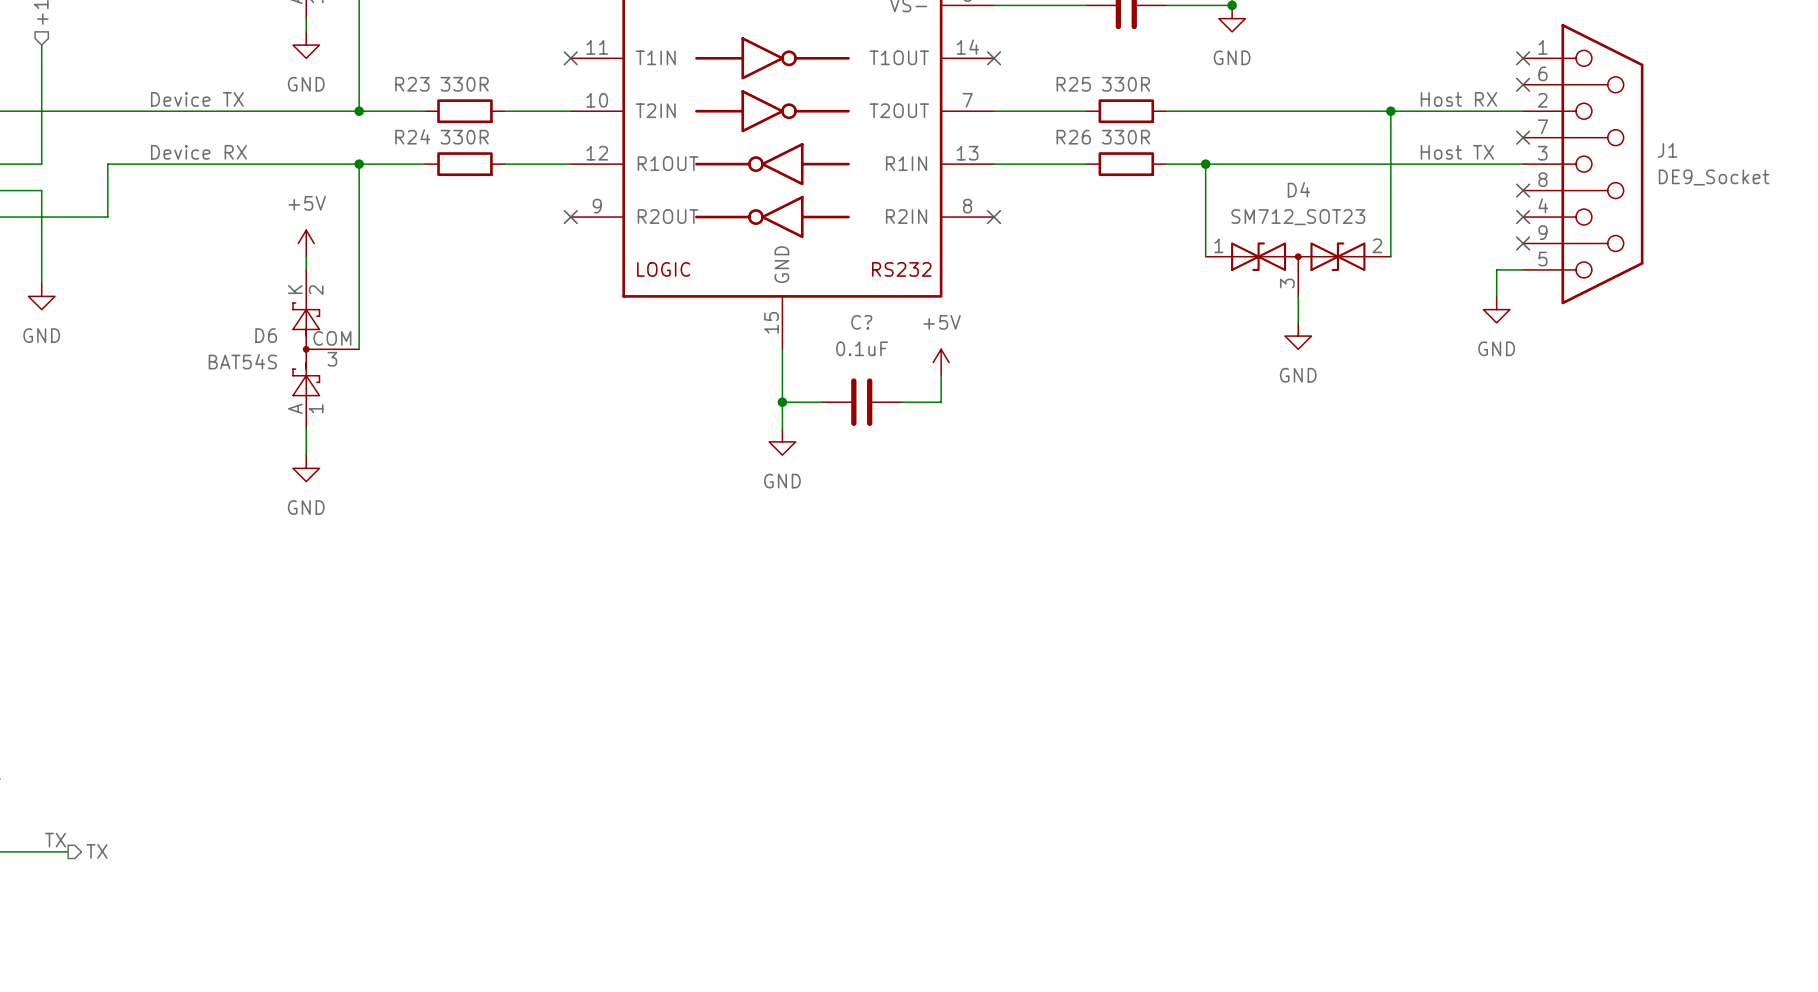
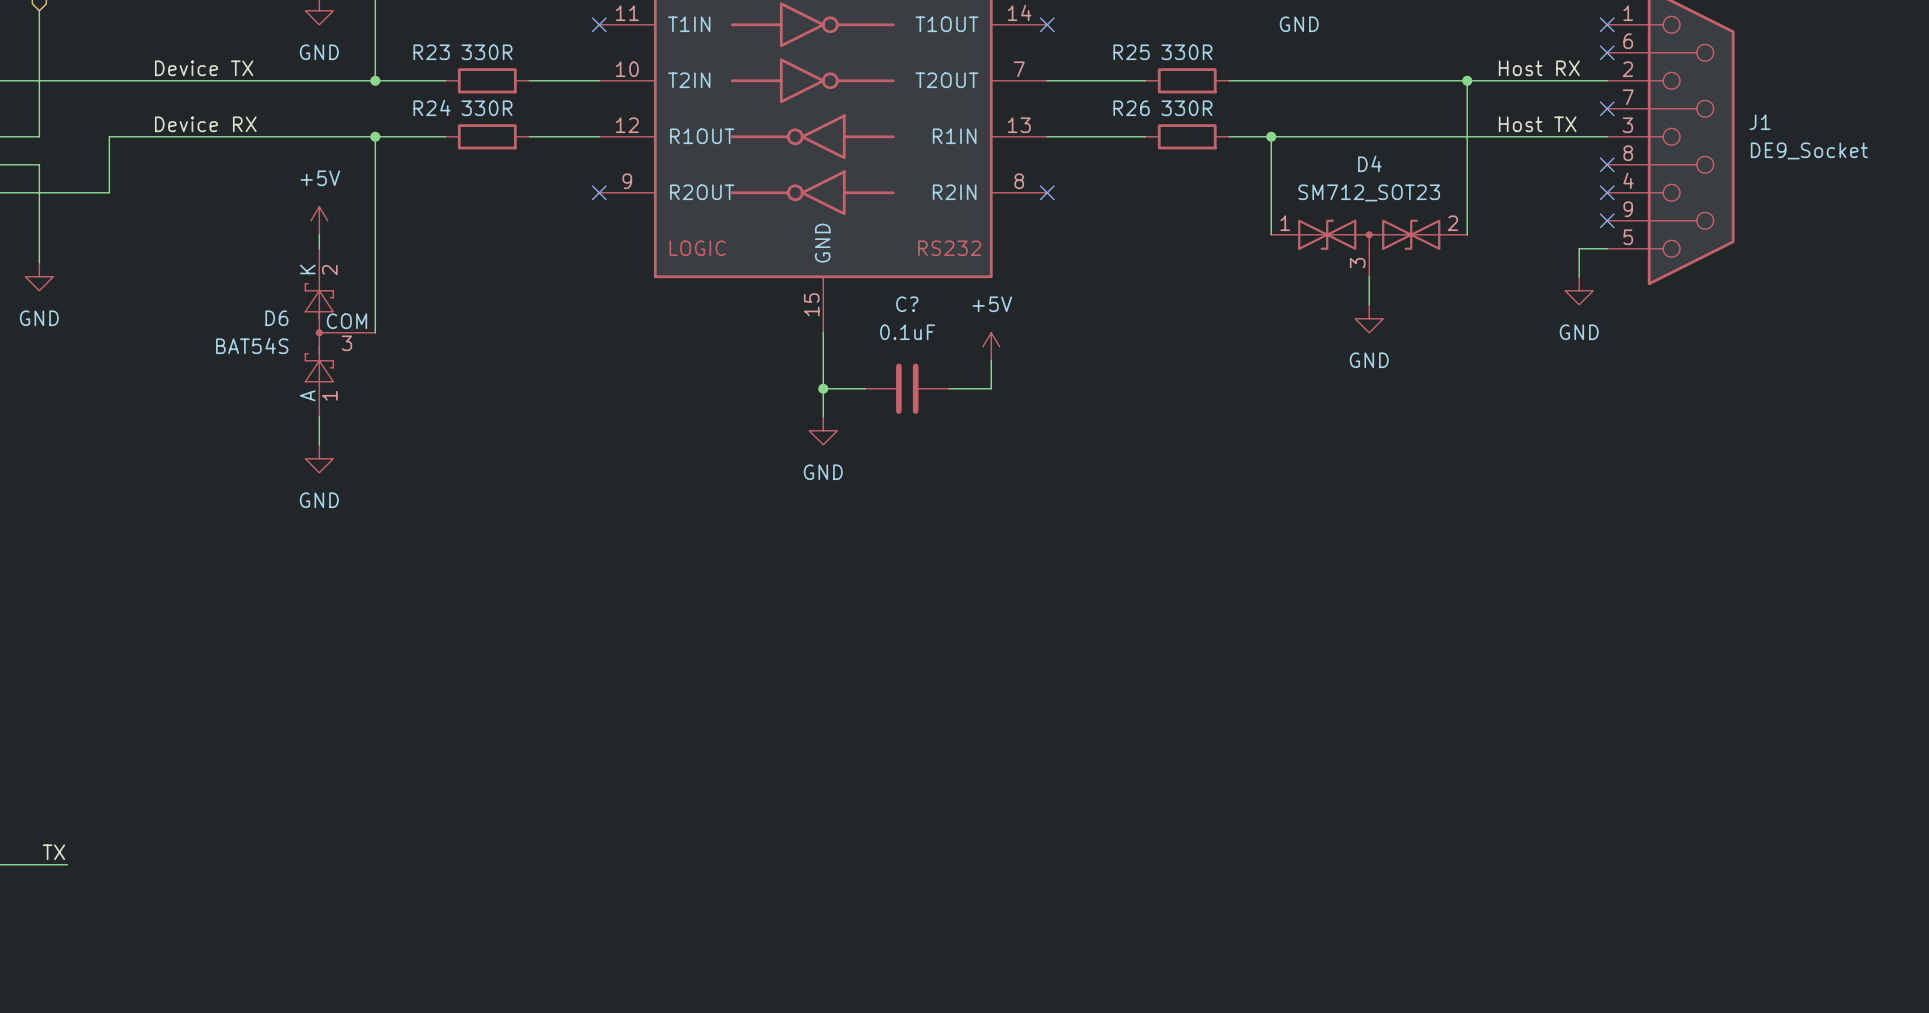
hierarchical label: TX (97, 851) -> none

